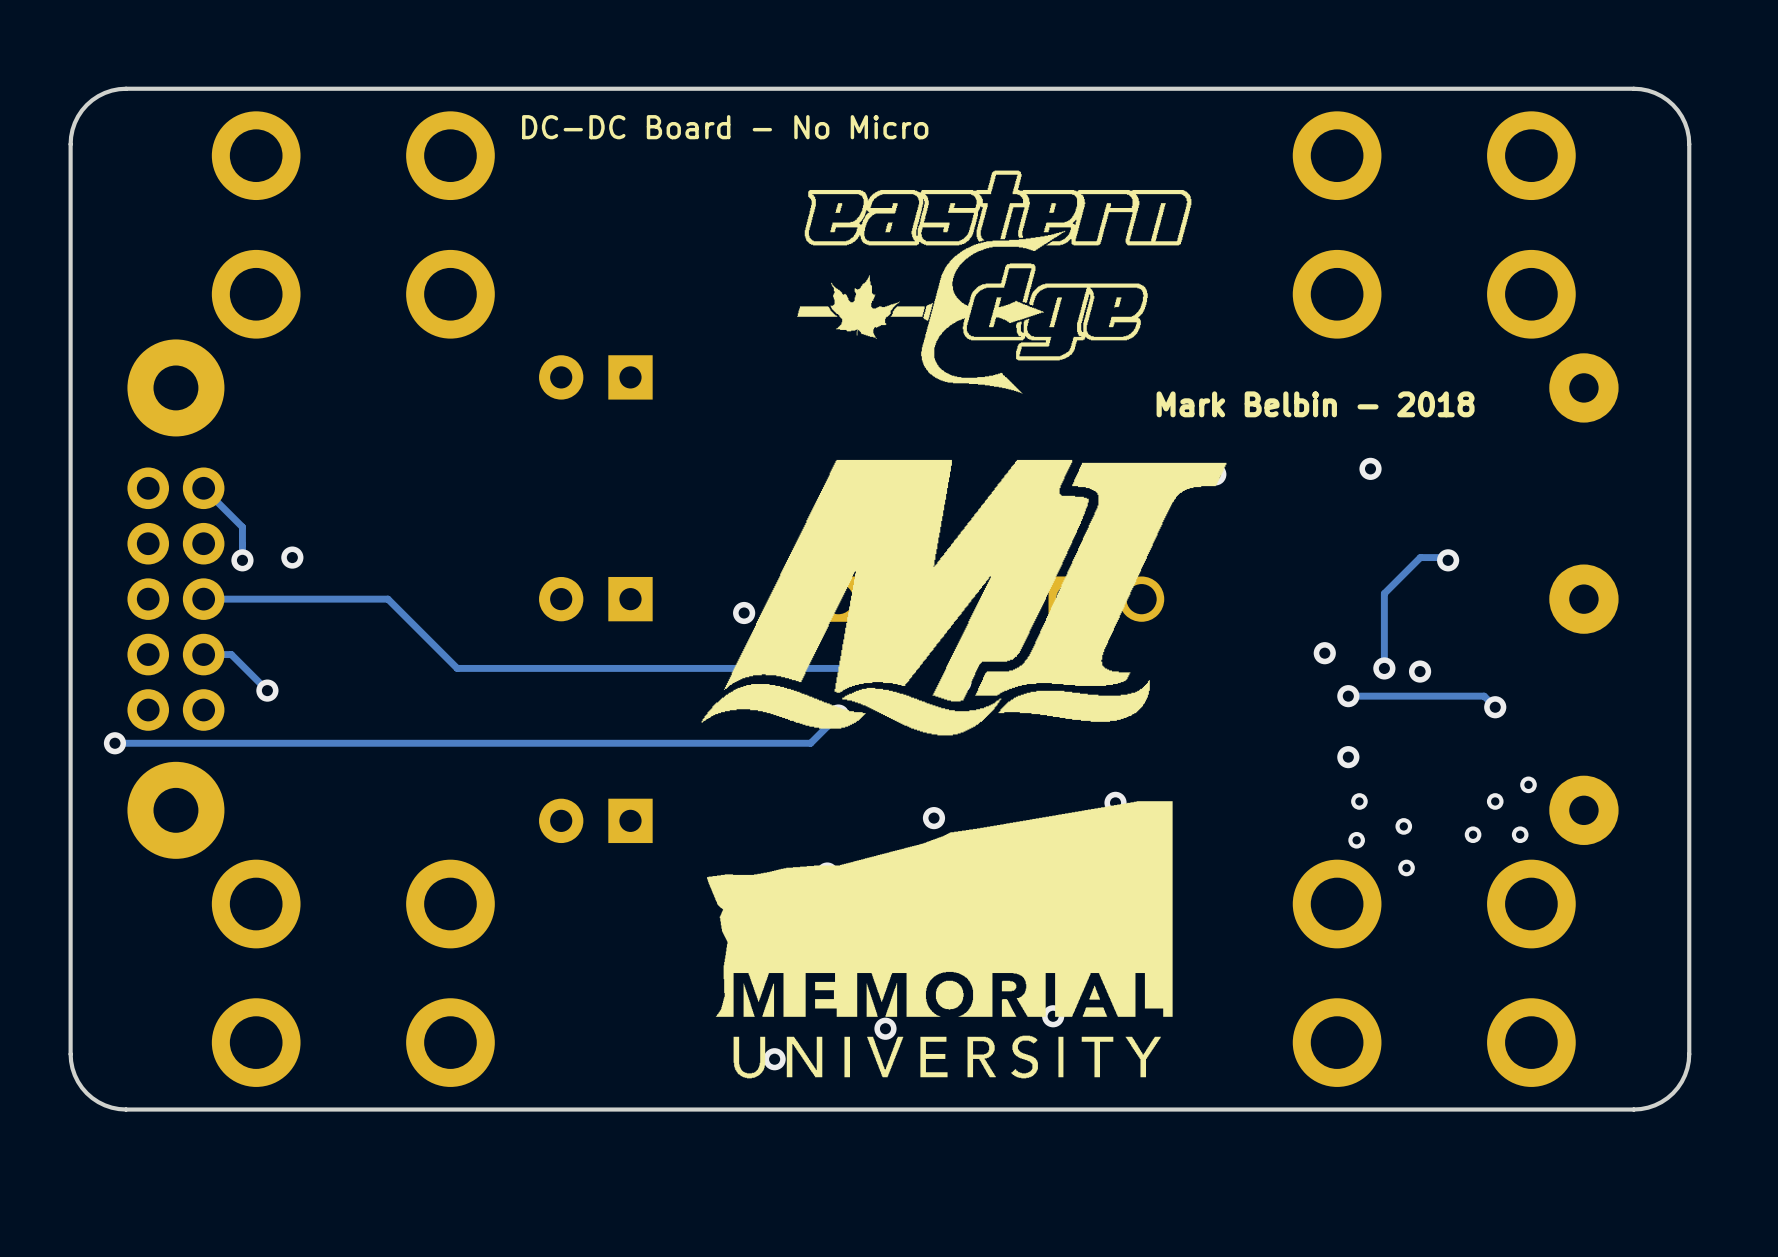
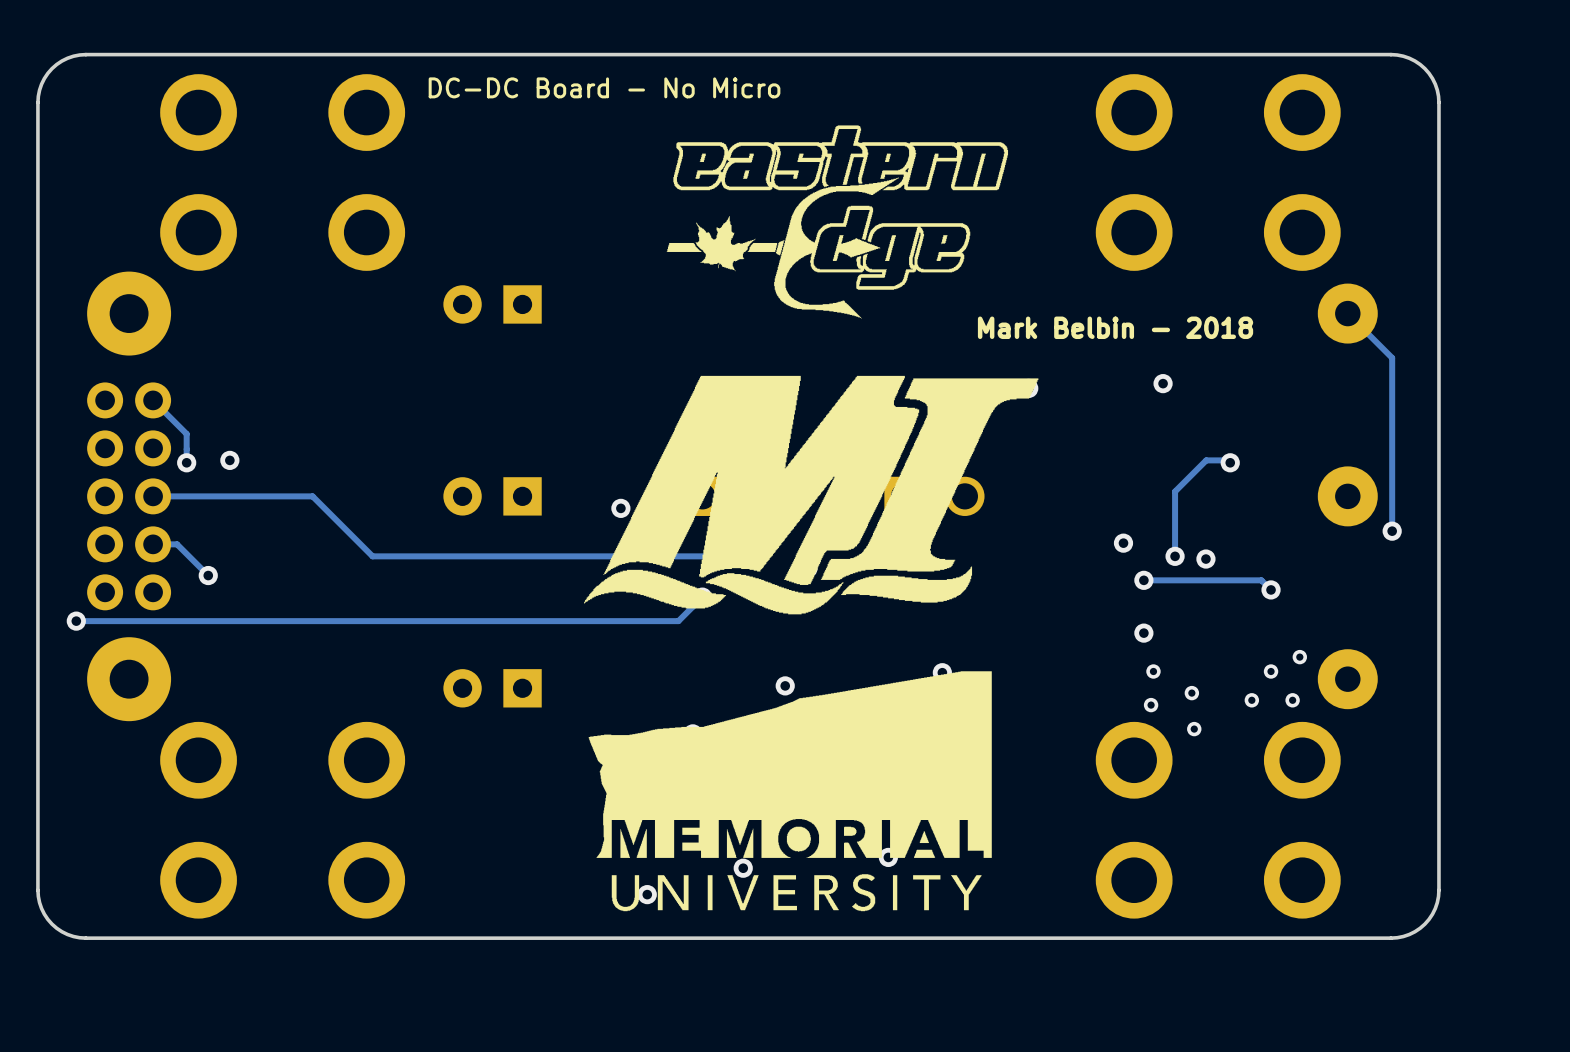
track: none -> (1347, 313) (1392, 357) (1392, 531)
via: none -> (1392, 531)

